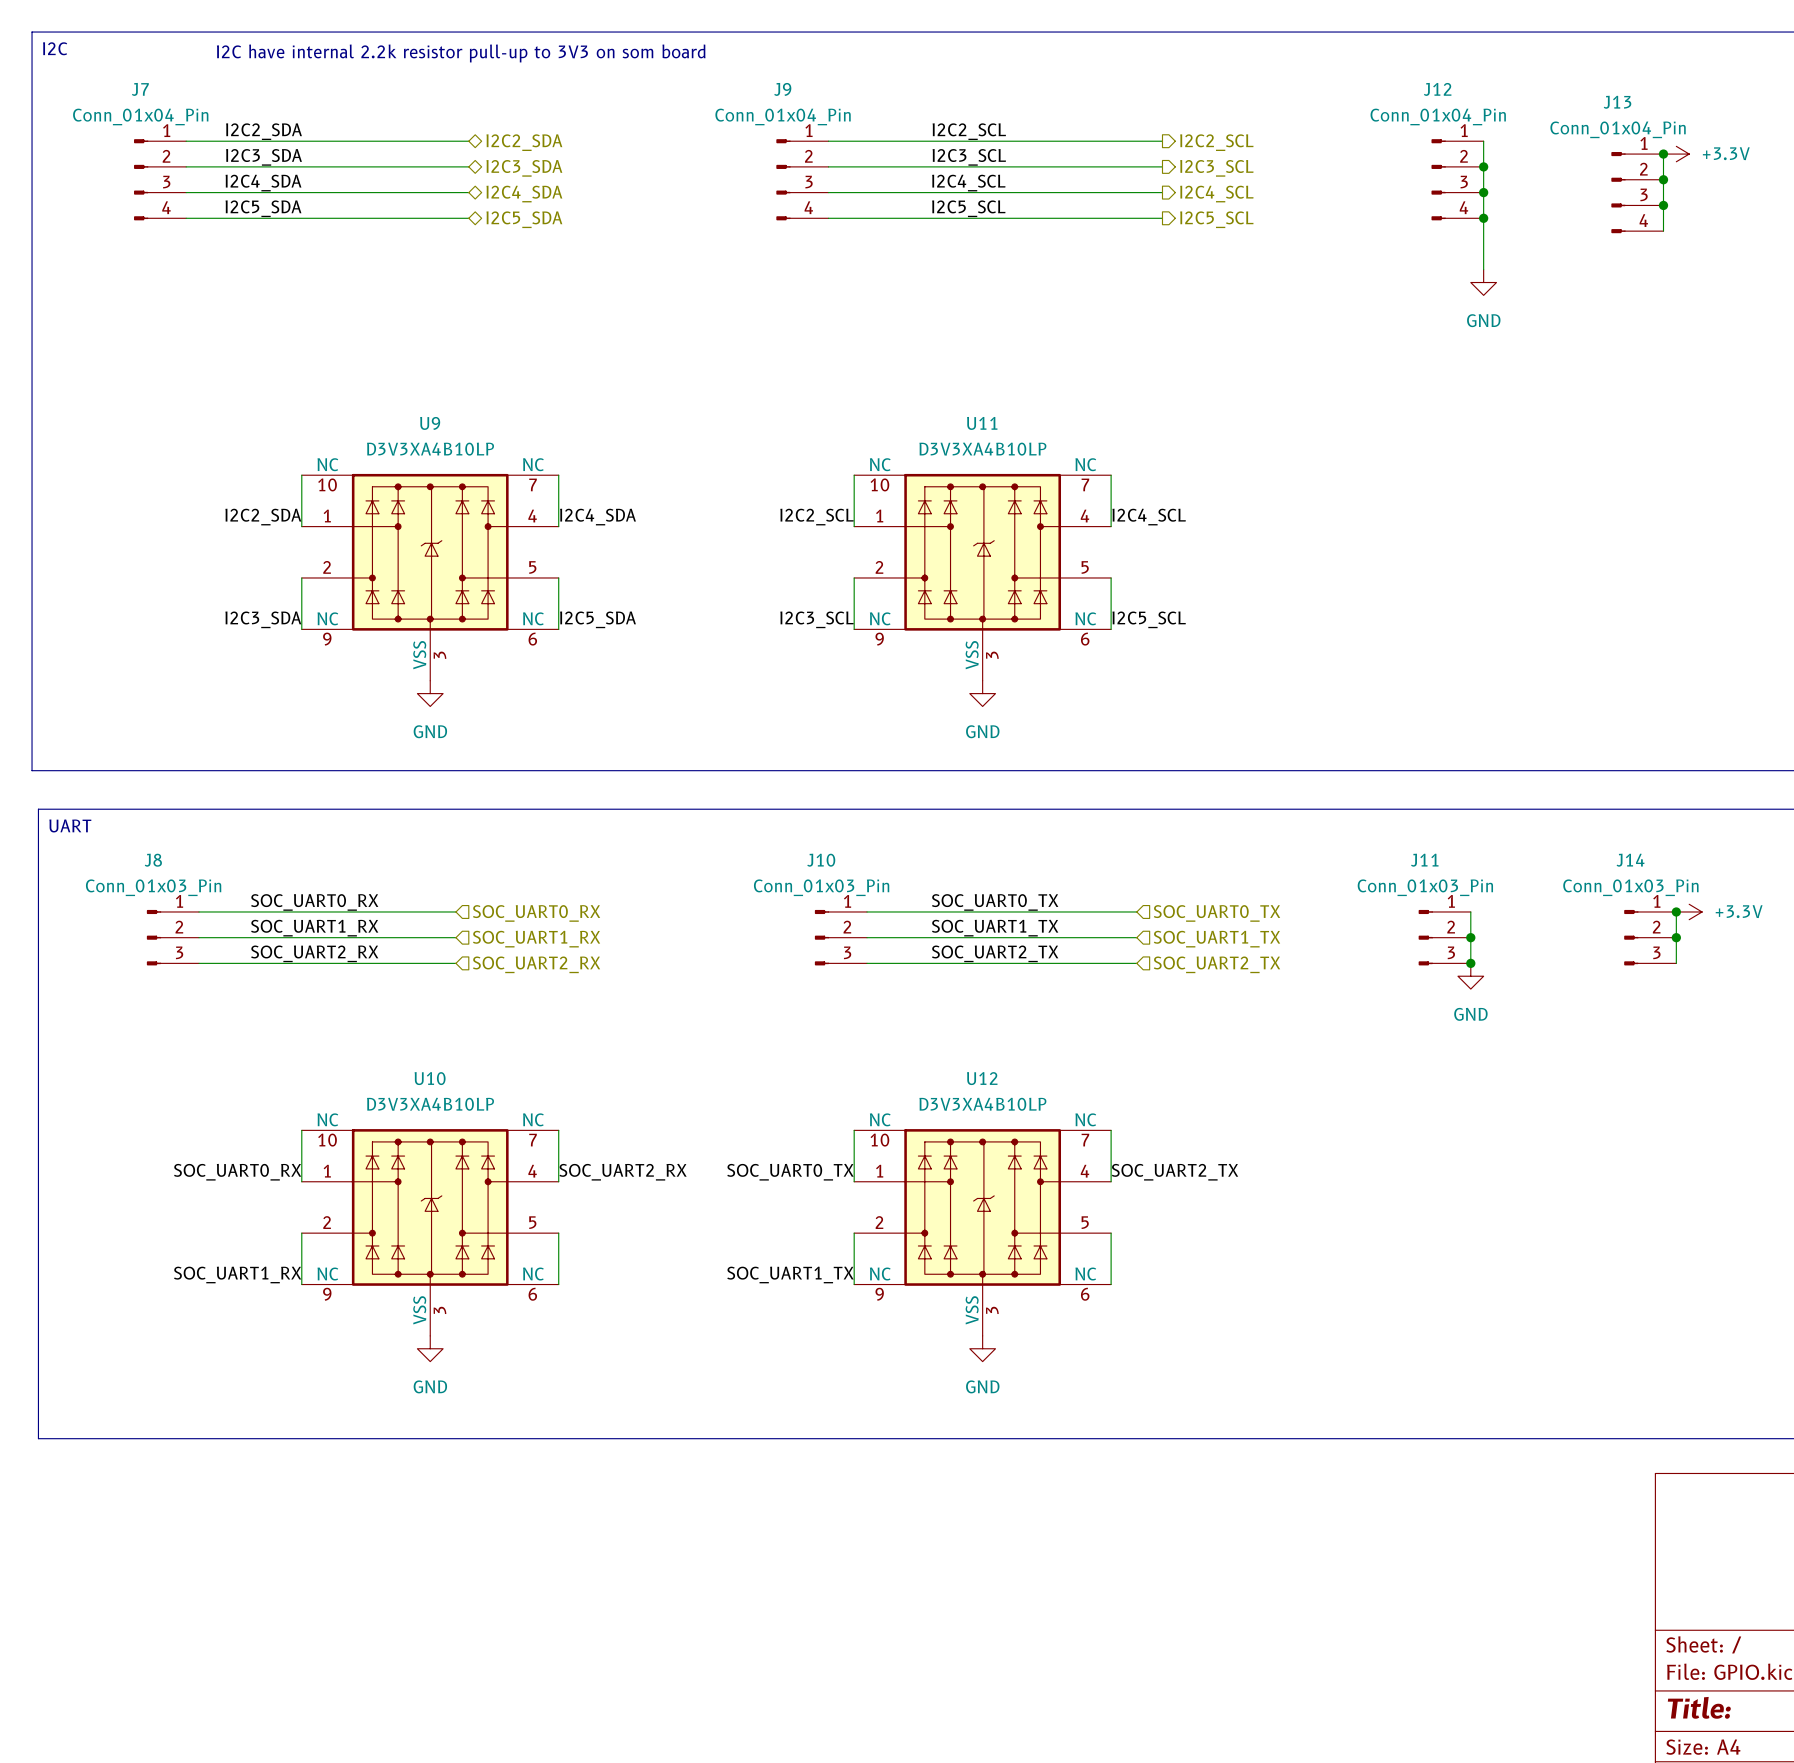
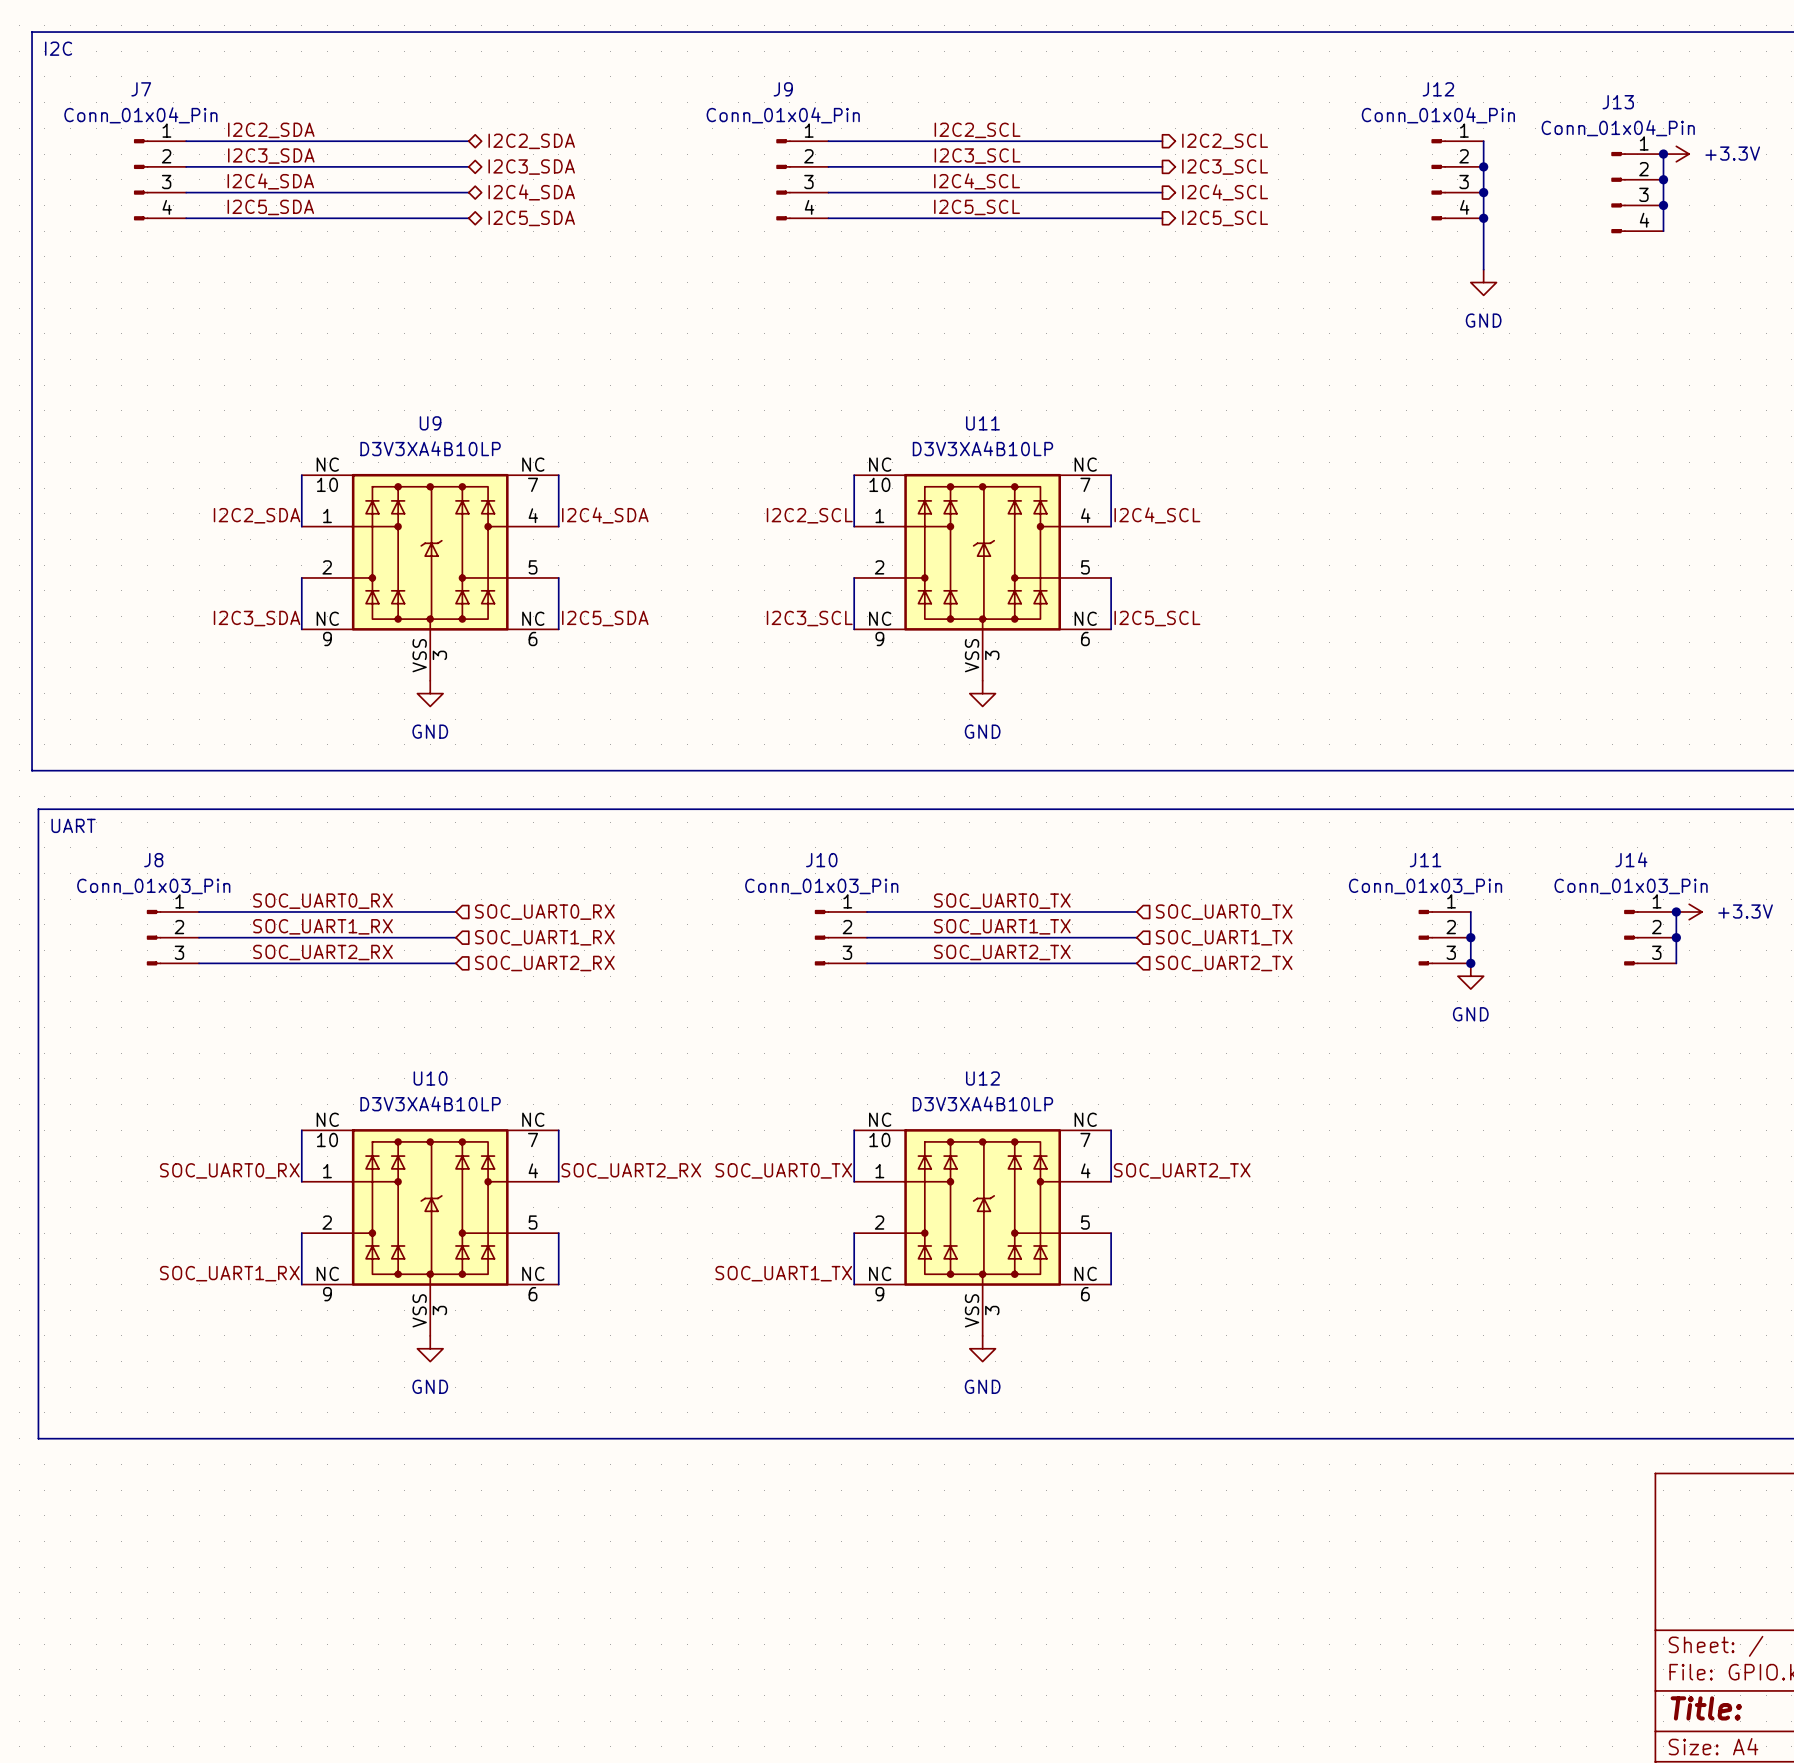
text: I2C have internal 2.2k resistor pull-up to 3V3 on som board (461, 53) -> none

